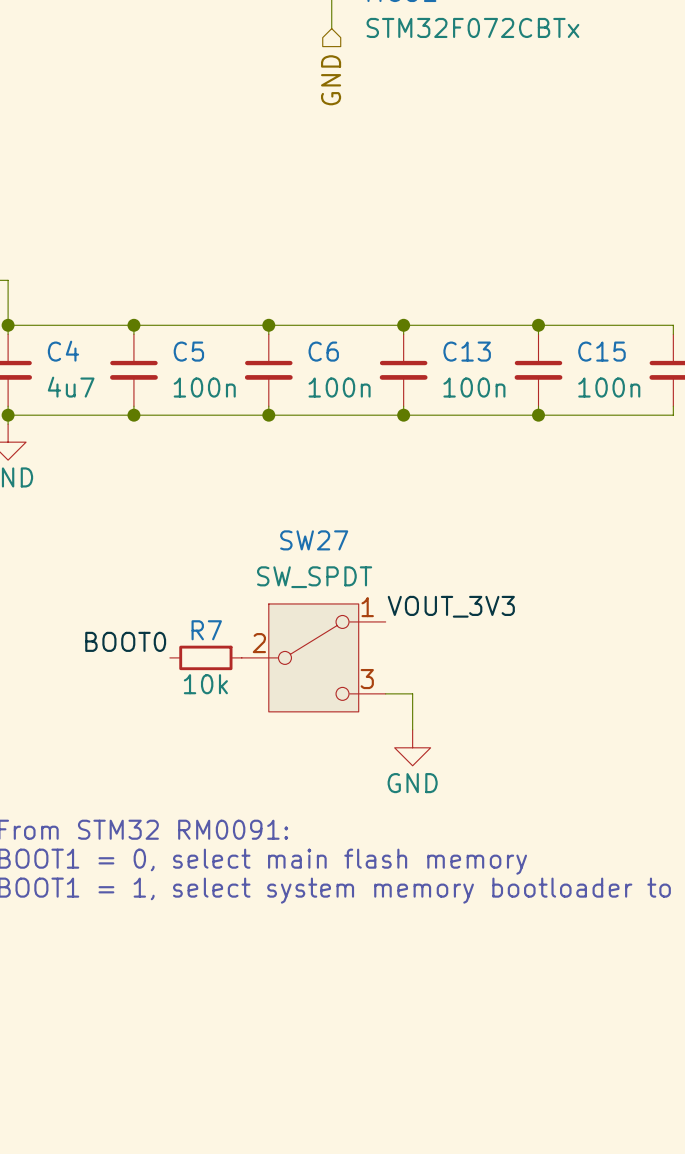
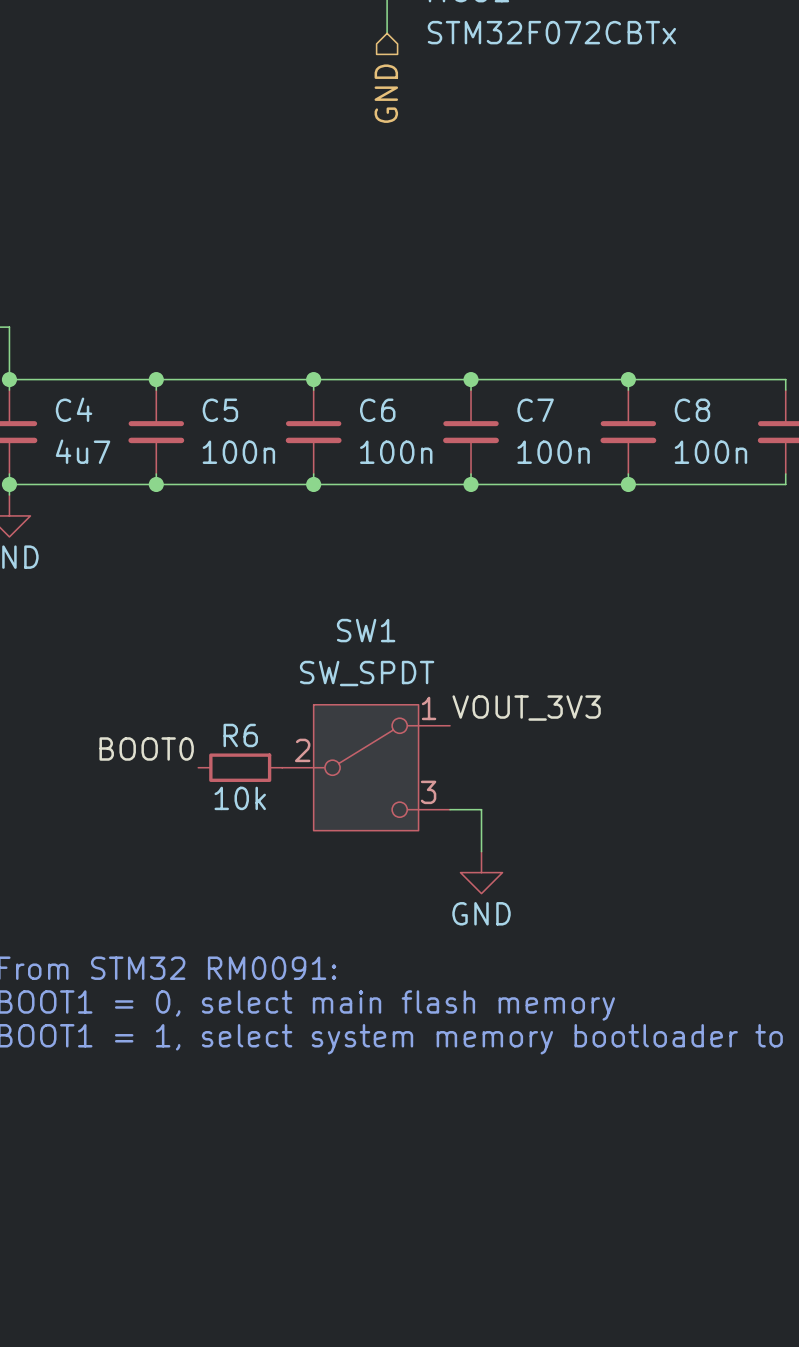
C13 name: C13 (467, 351) -> C7 (535, 410)
C15 name: C15 (601, 351) -> C8 (692, 410)
SW27 name: SW27 (314, 540) -> SW1 (366, 630)
R7 name: R7 (206, 630) -> R6 (240, 735)

